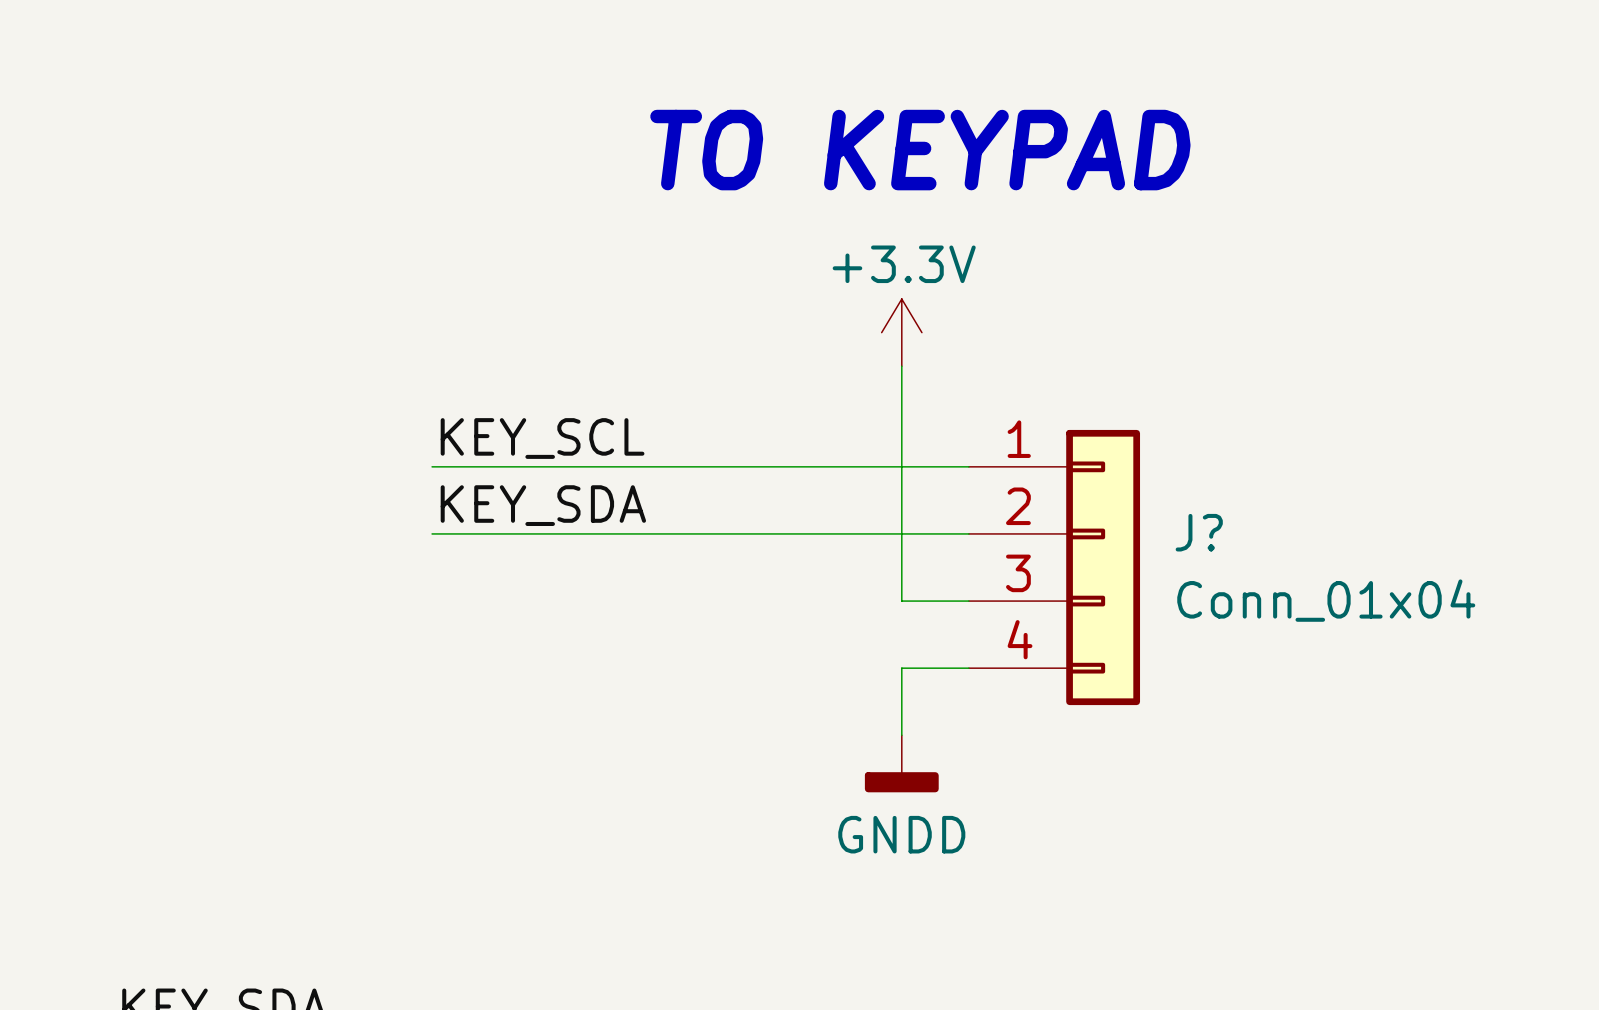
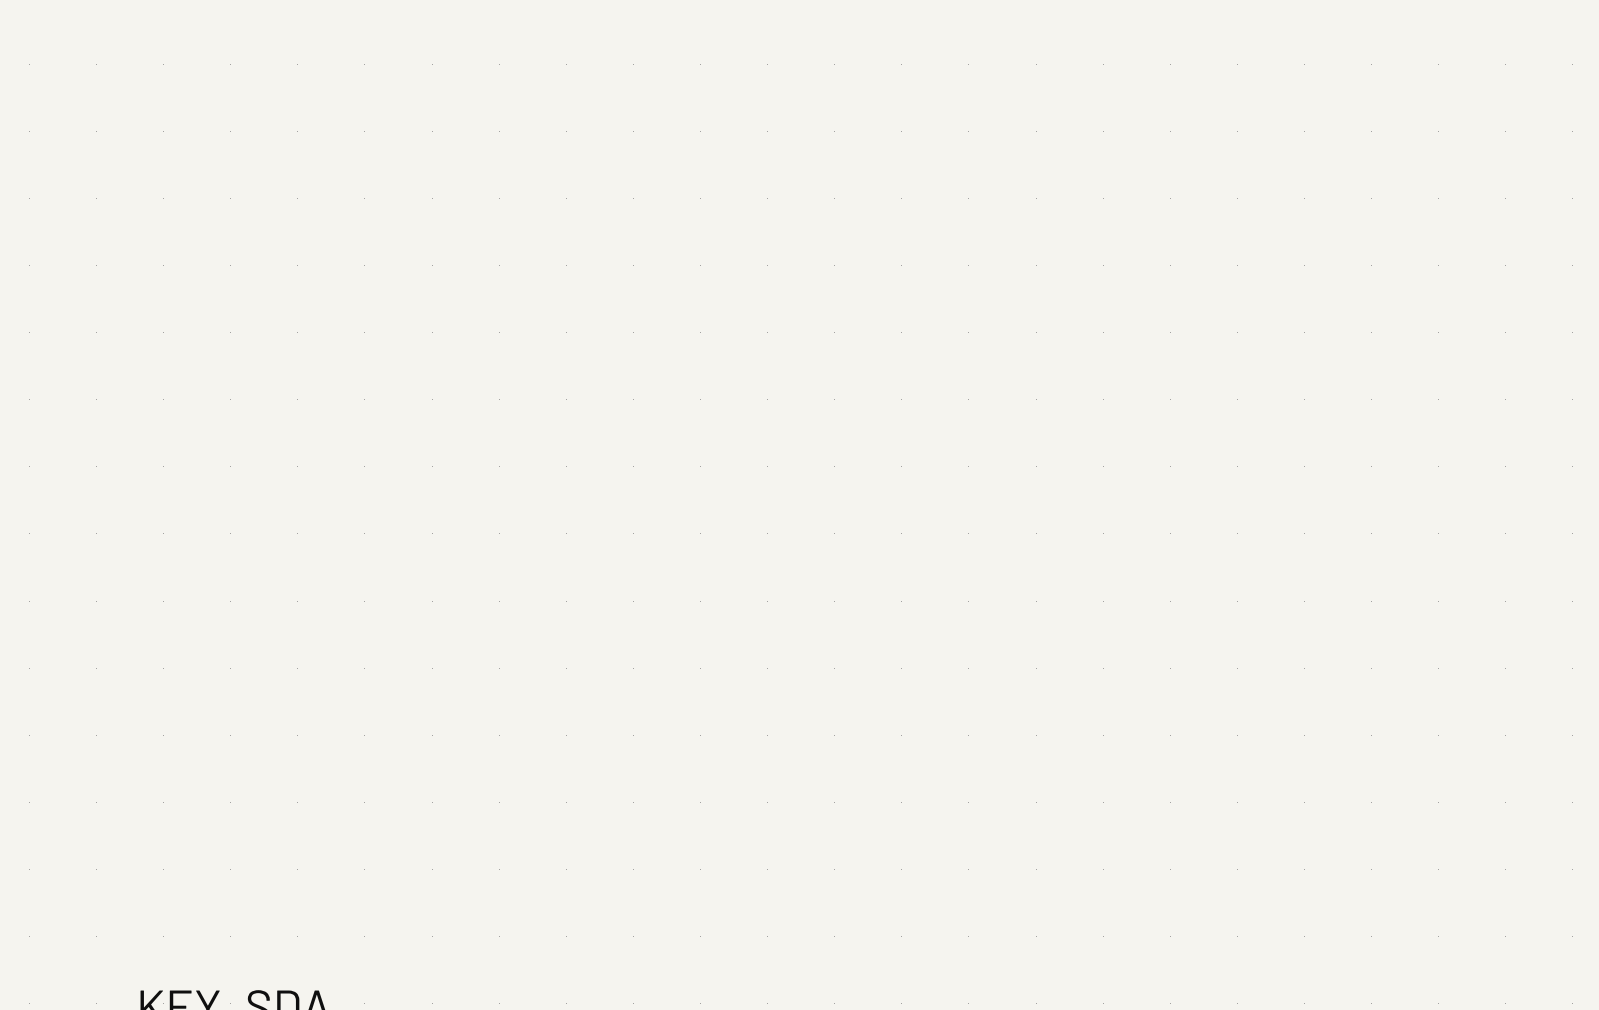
text: TO KEYPAD (920, 150) -> none
power symbol: +3.3V (901, 332) -> none
wire: (901, 366) (901, 601) (968, 601) -> none
label: KEY_SCL (542, 438) -> none
wire: (432, 466) (968, 466) -> none
label: KEY_SDA (543, 505) -> none
wire: (432, 533) (968, 533) -> none
J?: Conn_01x04 (1054, 567) -> none
wire: (968, 668) (901, 668) (901, 735) -> none
power symbol: GNDD (901, 763) -> none

